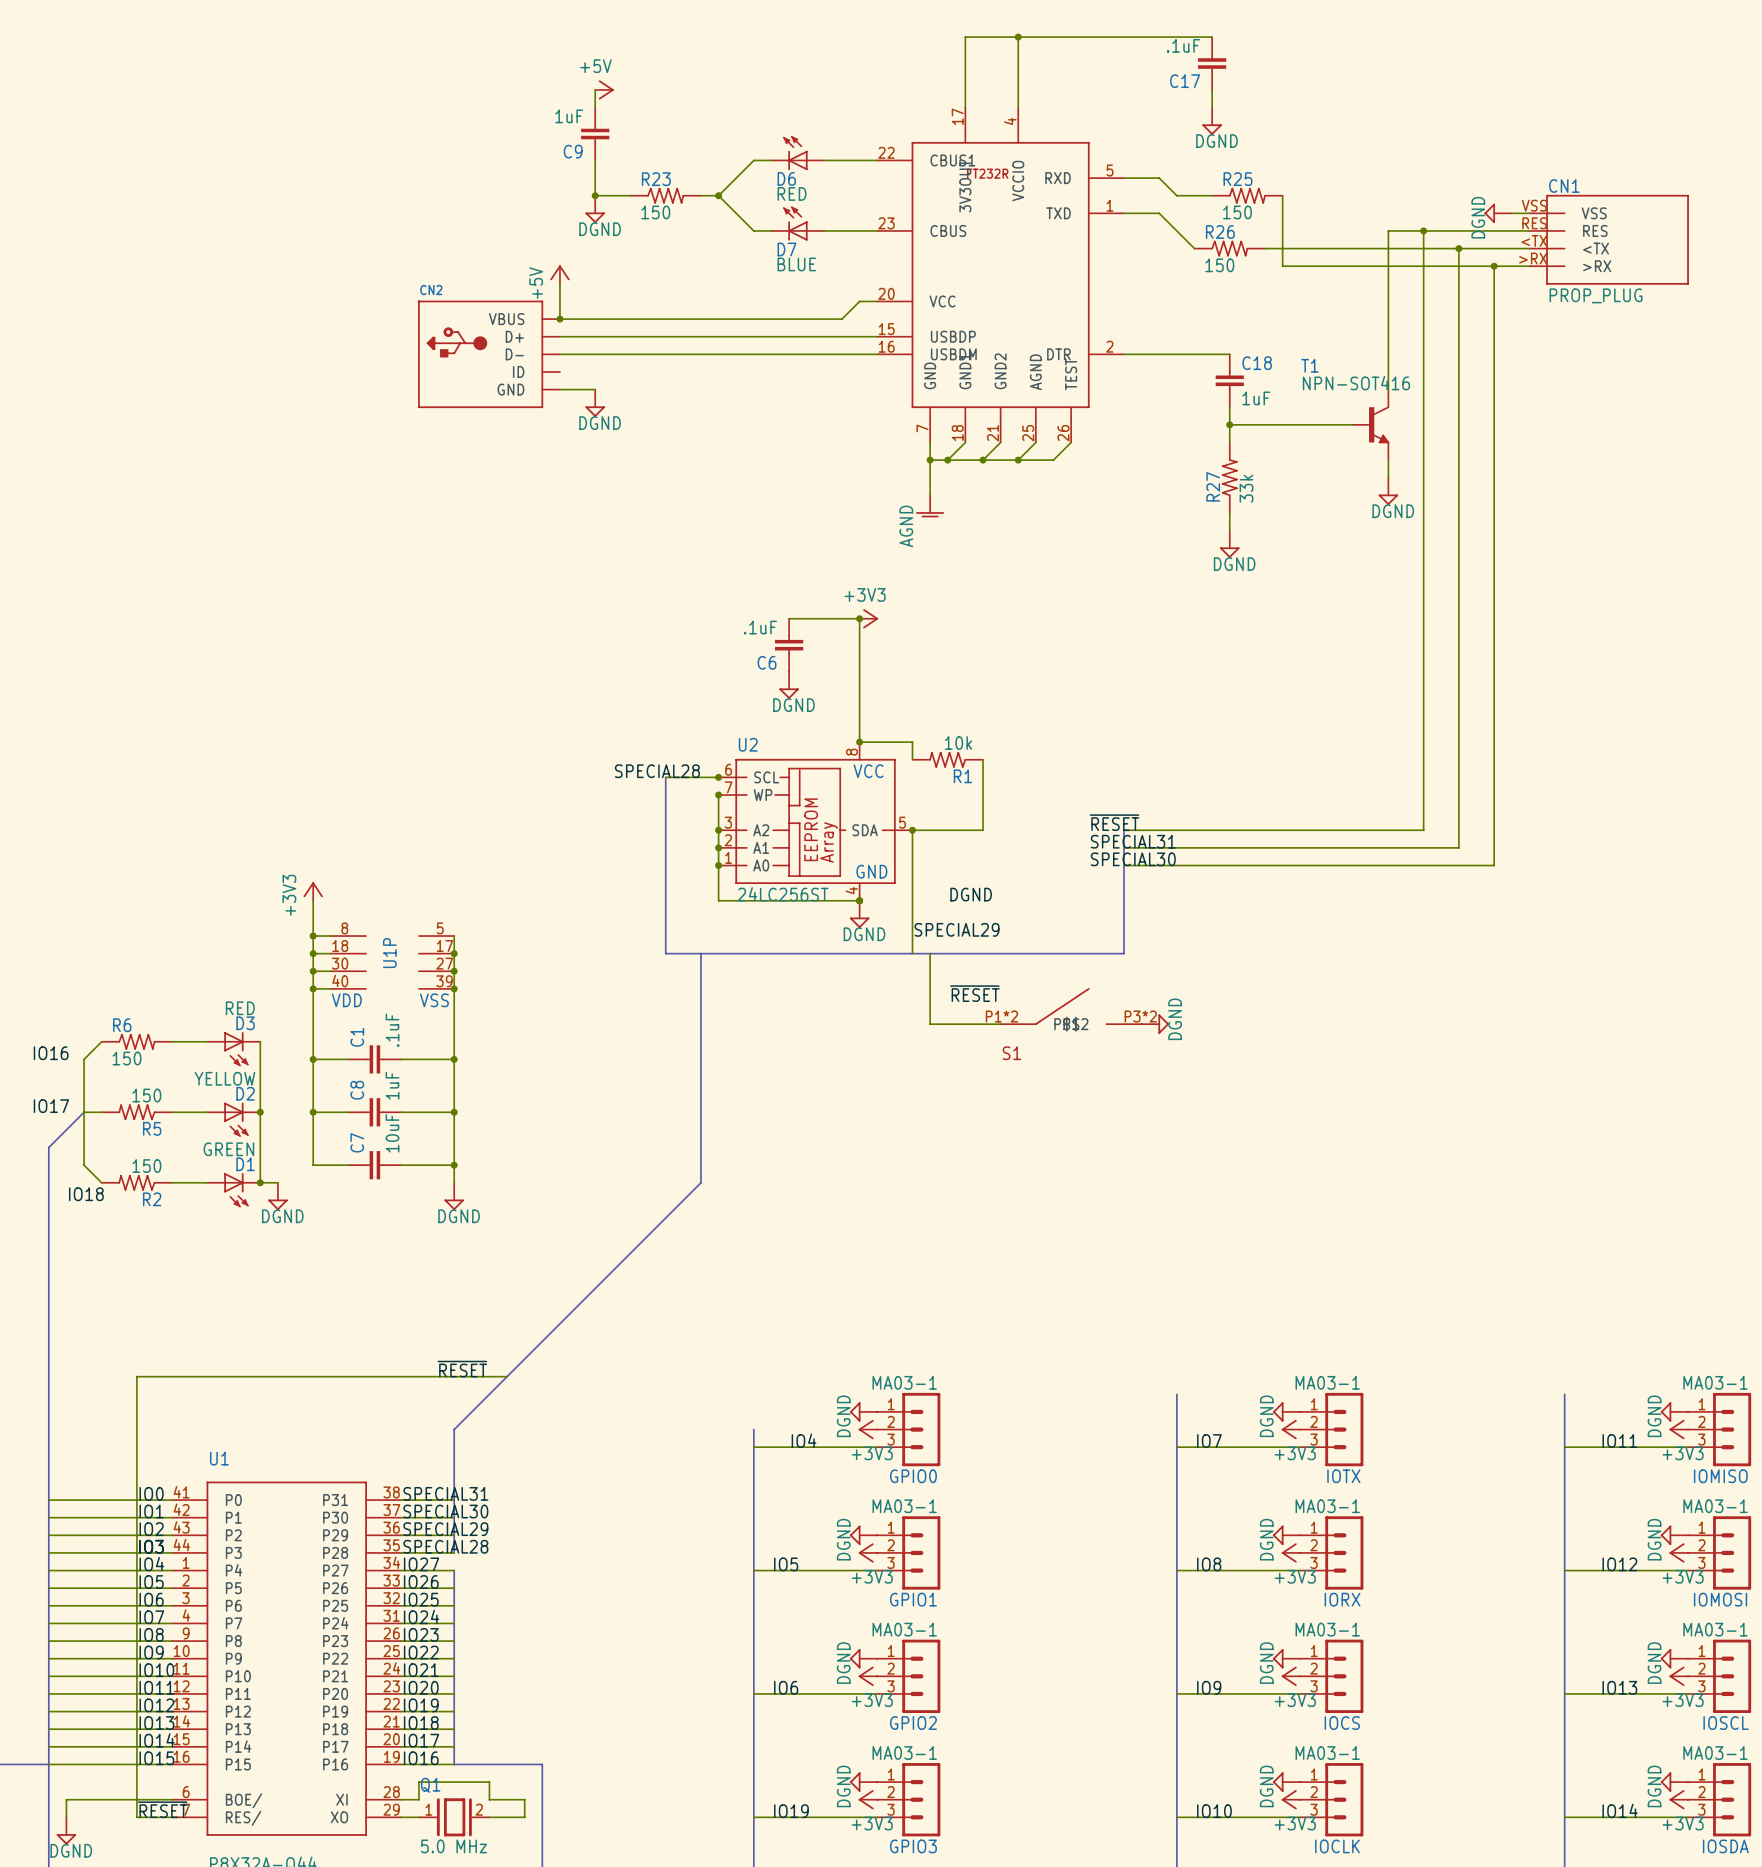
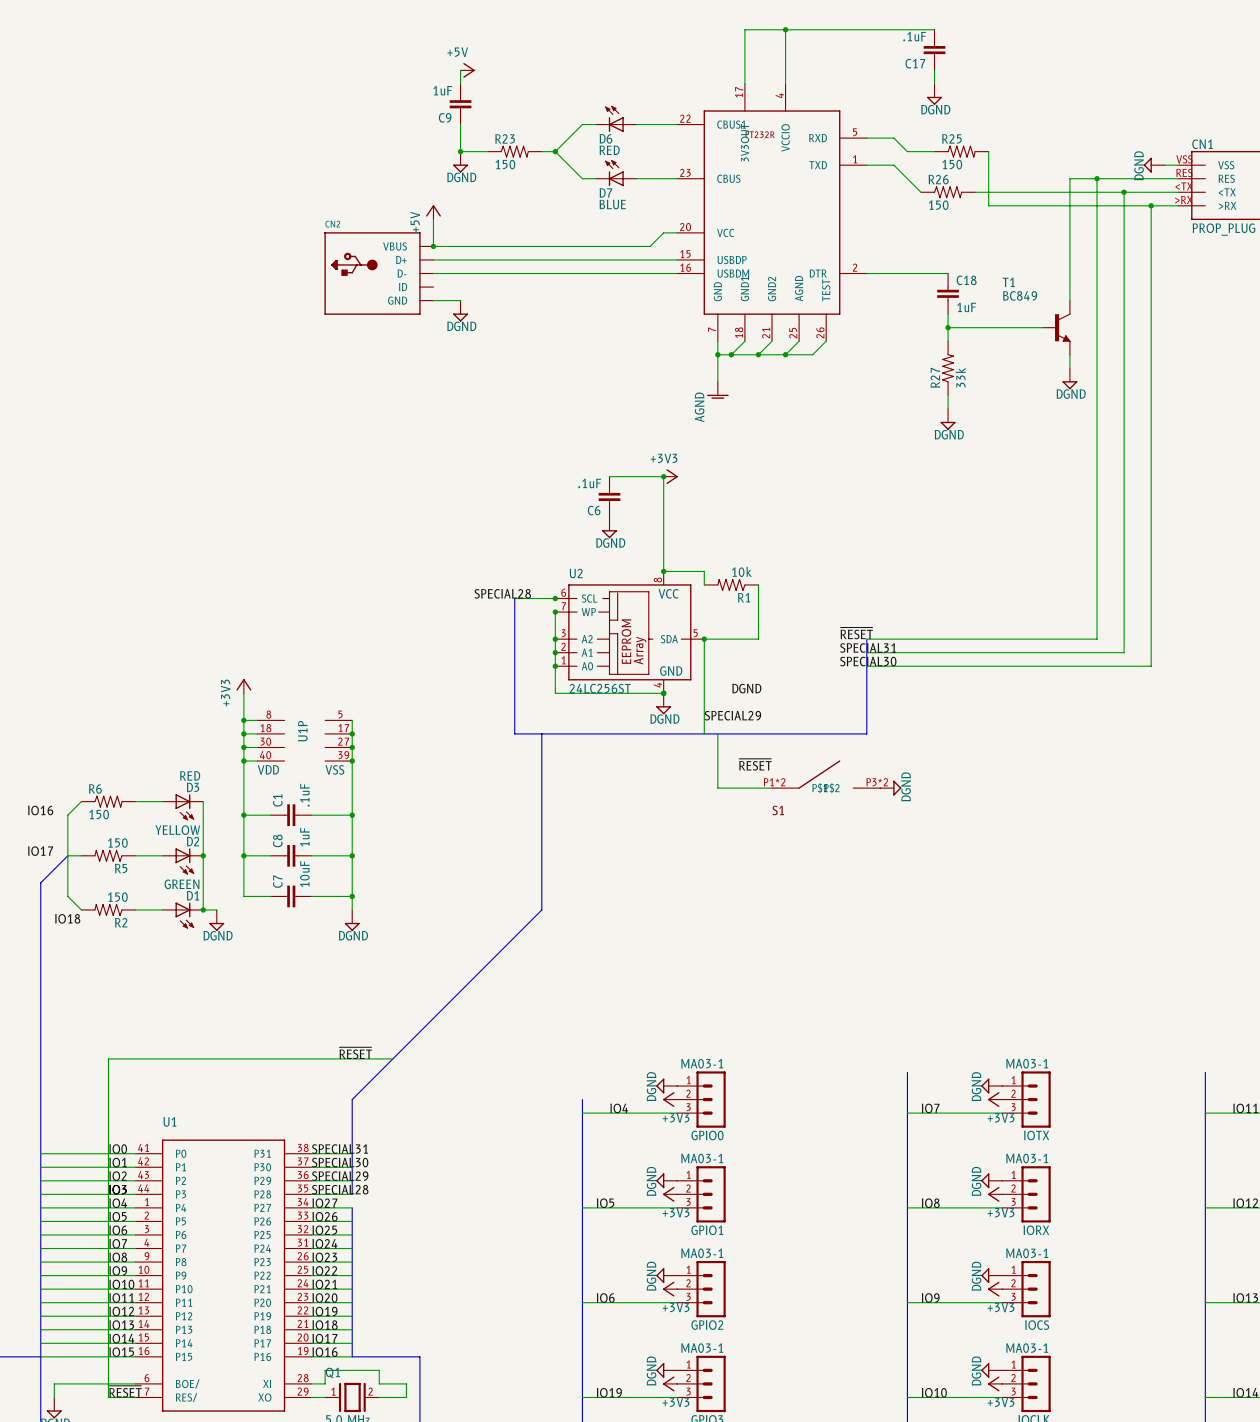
T1 value: NPN-SOT416 (1356, 383) -> BC849 (1020, 295)

